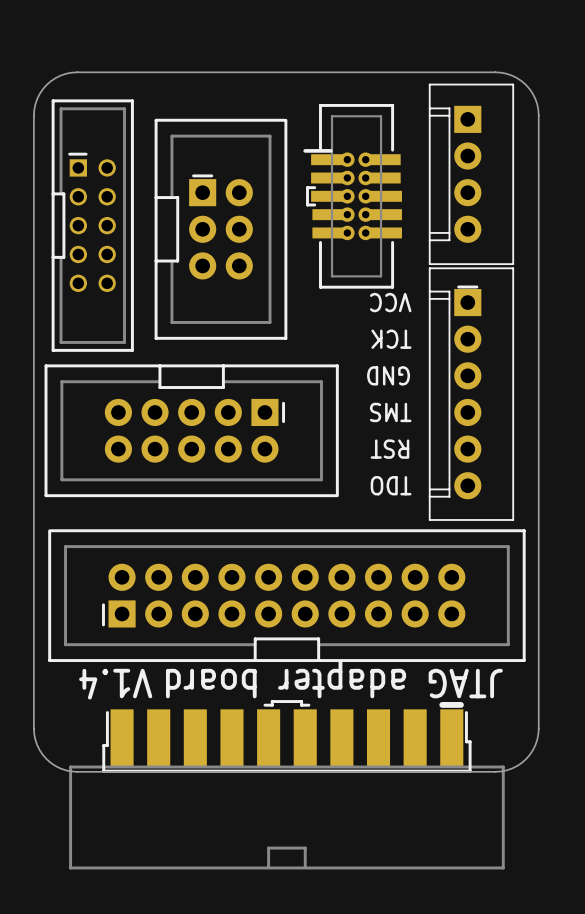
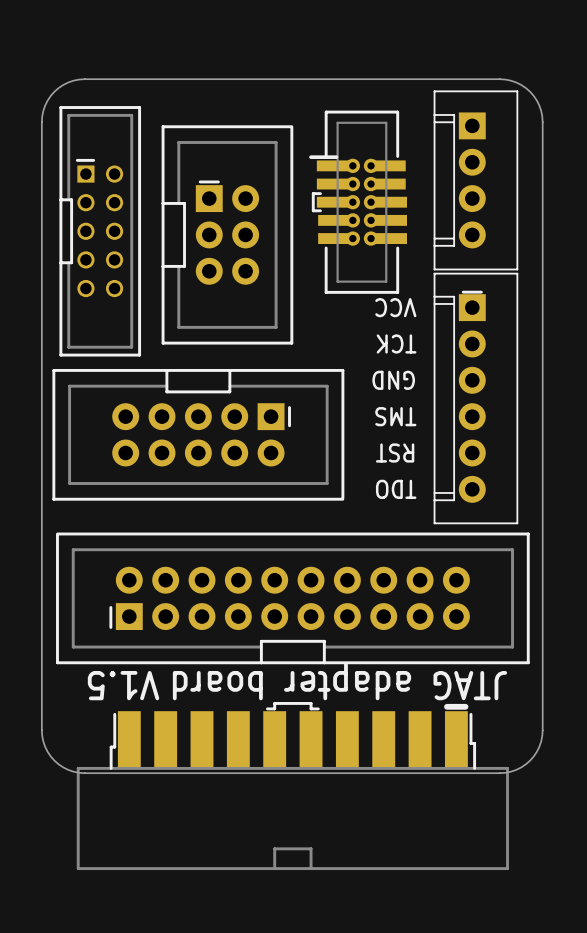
text: V1.4 (115, 684) -> V1.5 (123, 685)
part footprint: [69, 700, 505, 870] -> [76, 702, 509, 871]

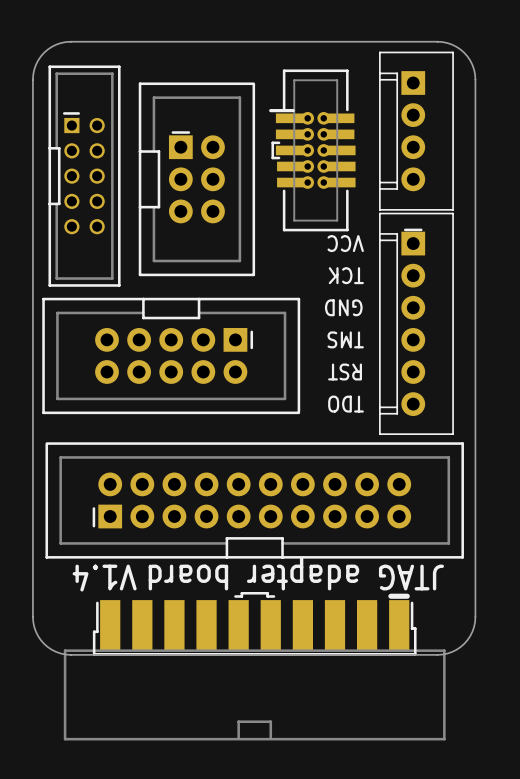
text: V1.5 (123, 685) -> V1.4 (104, 578)
part footprint: [76, 702, 509, 871] -> [63, 591, 446, 741]

